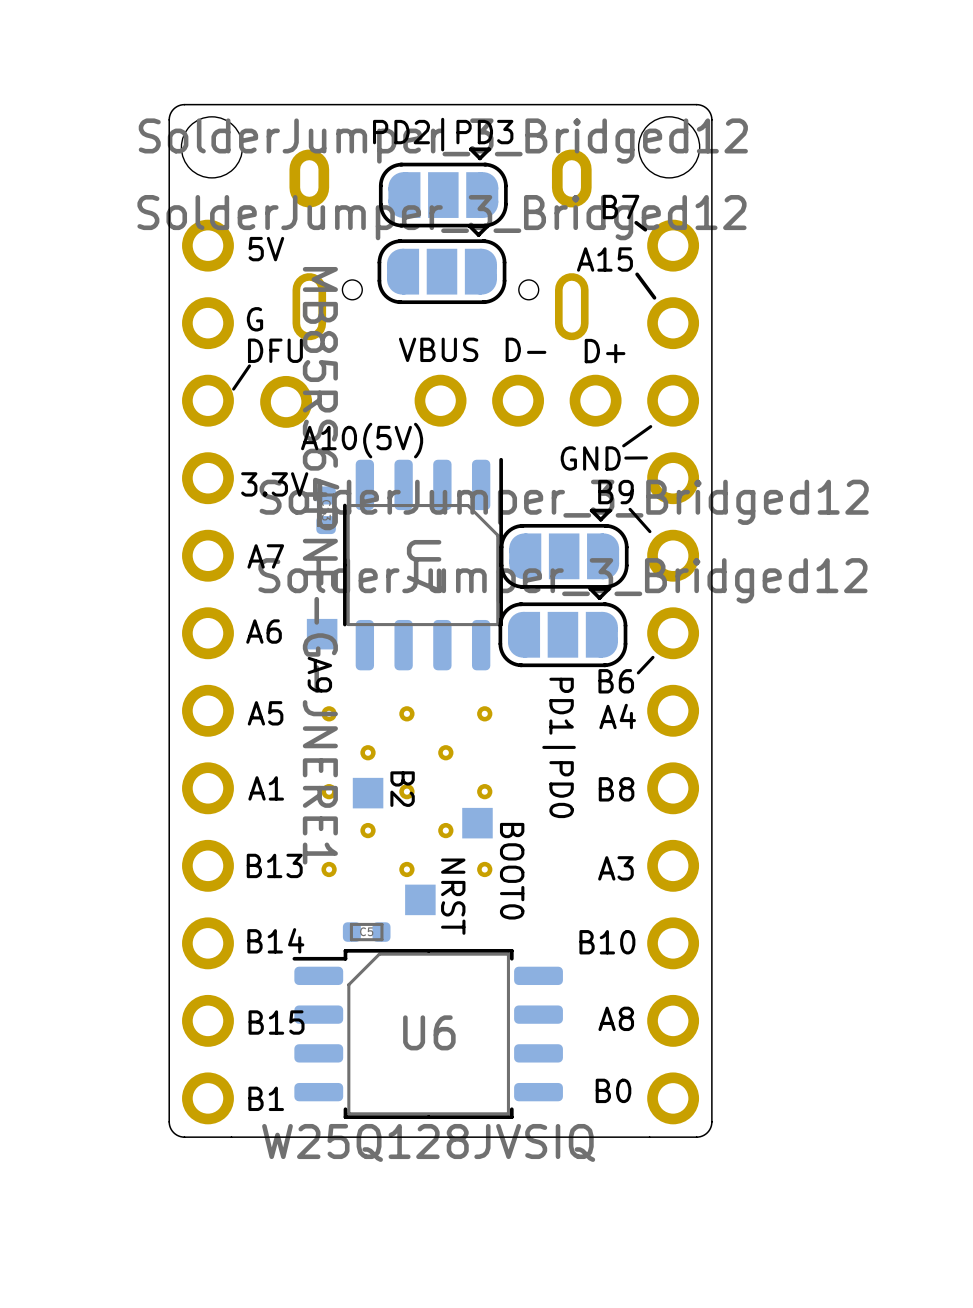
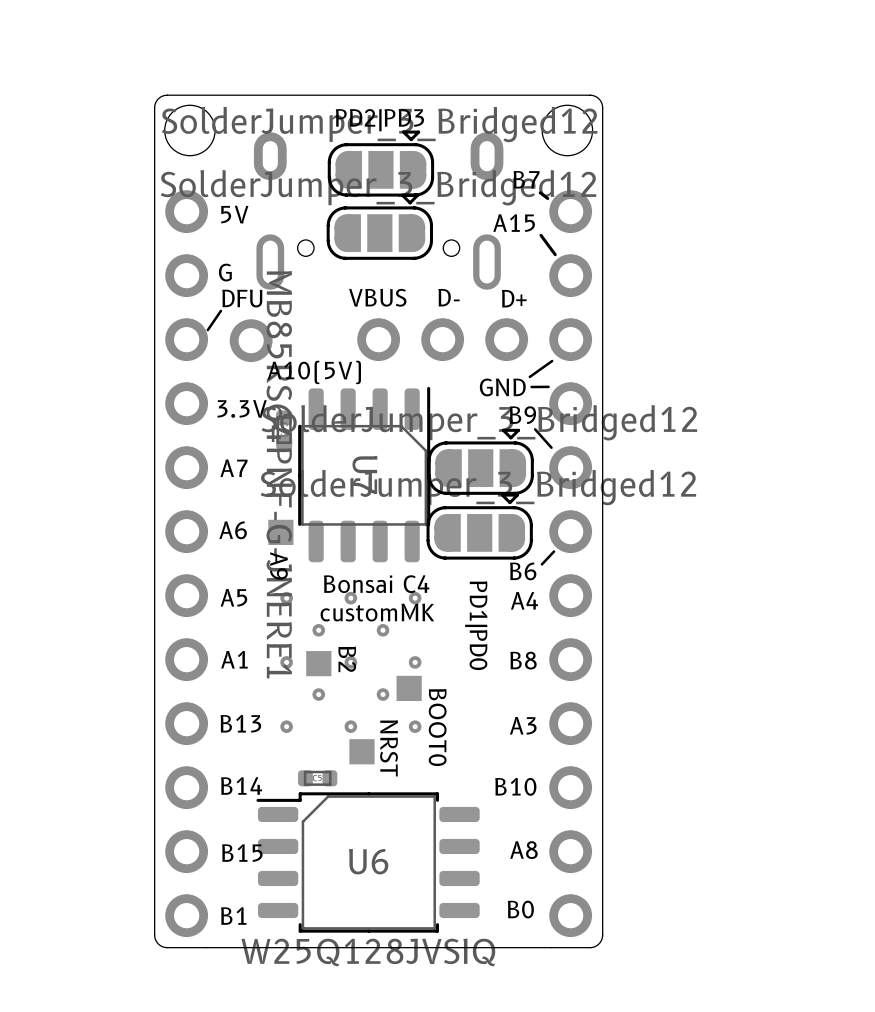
text: none -> Bonsai C4 (376, 584)
text: none -> customMK (377, 612)

